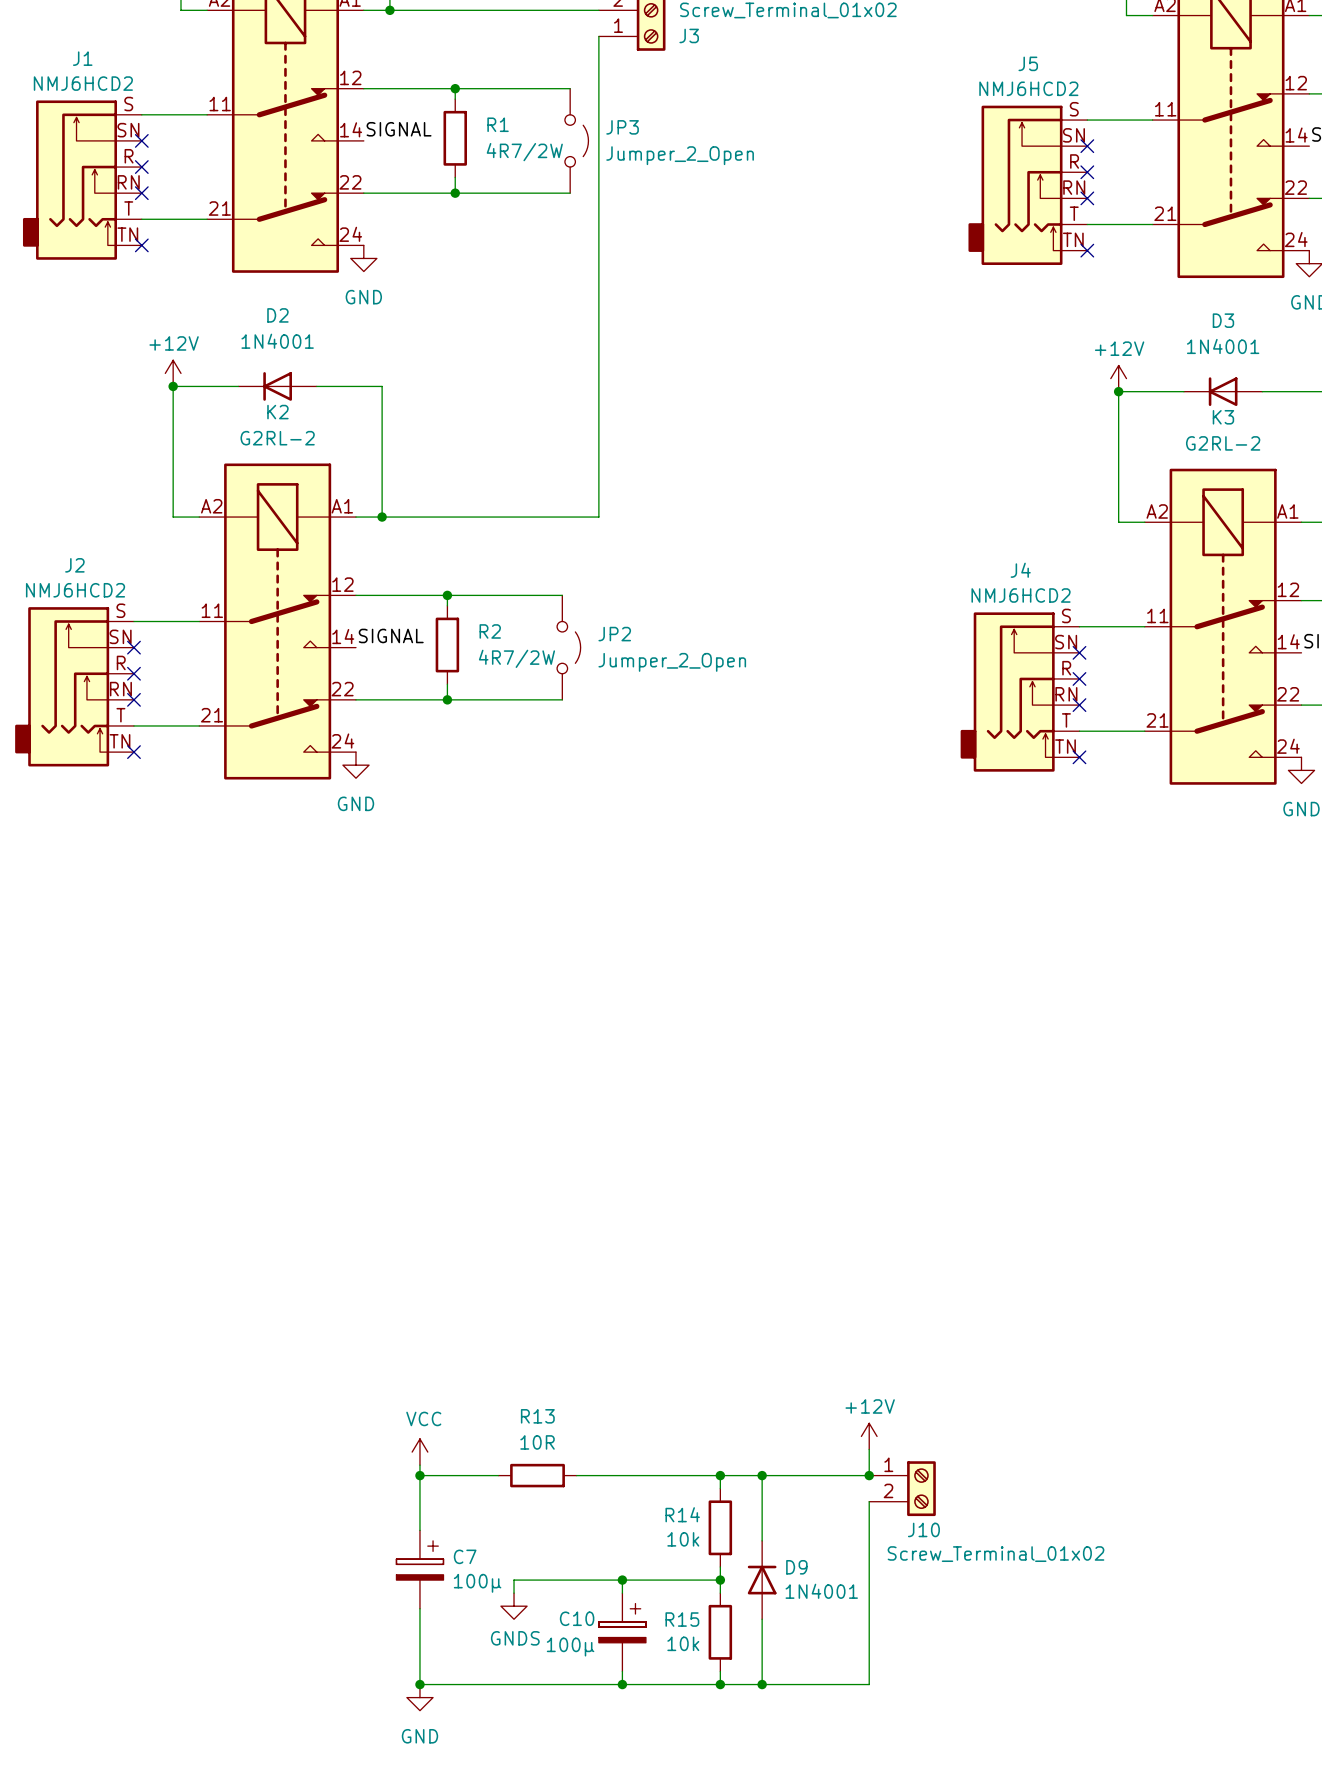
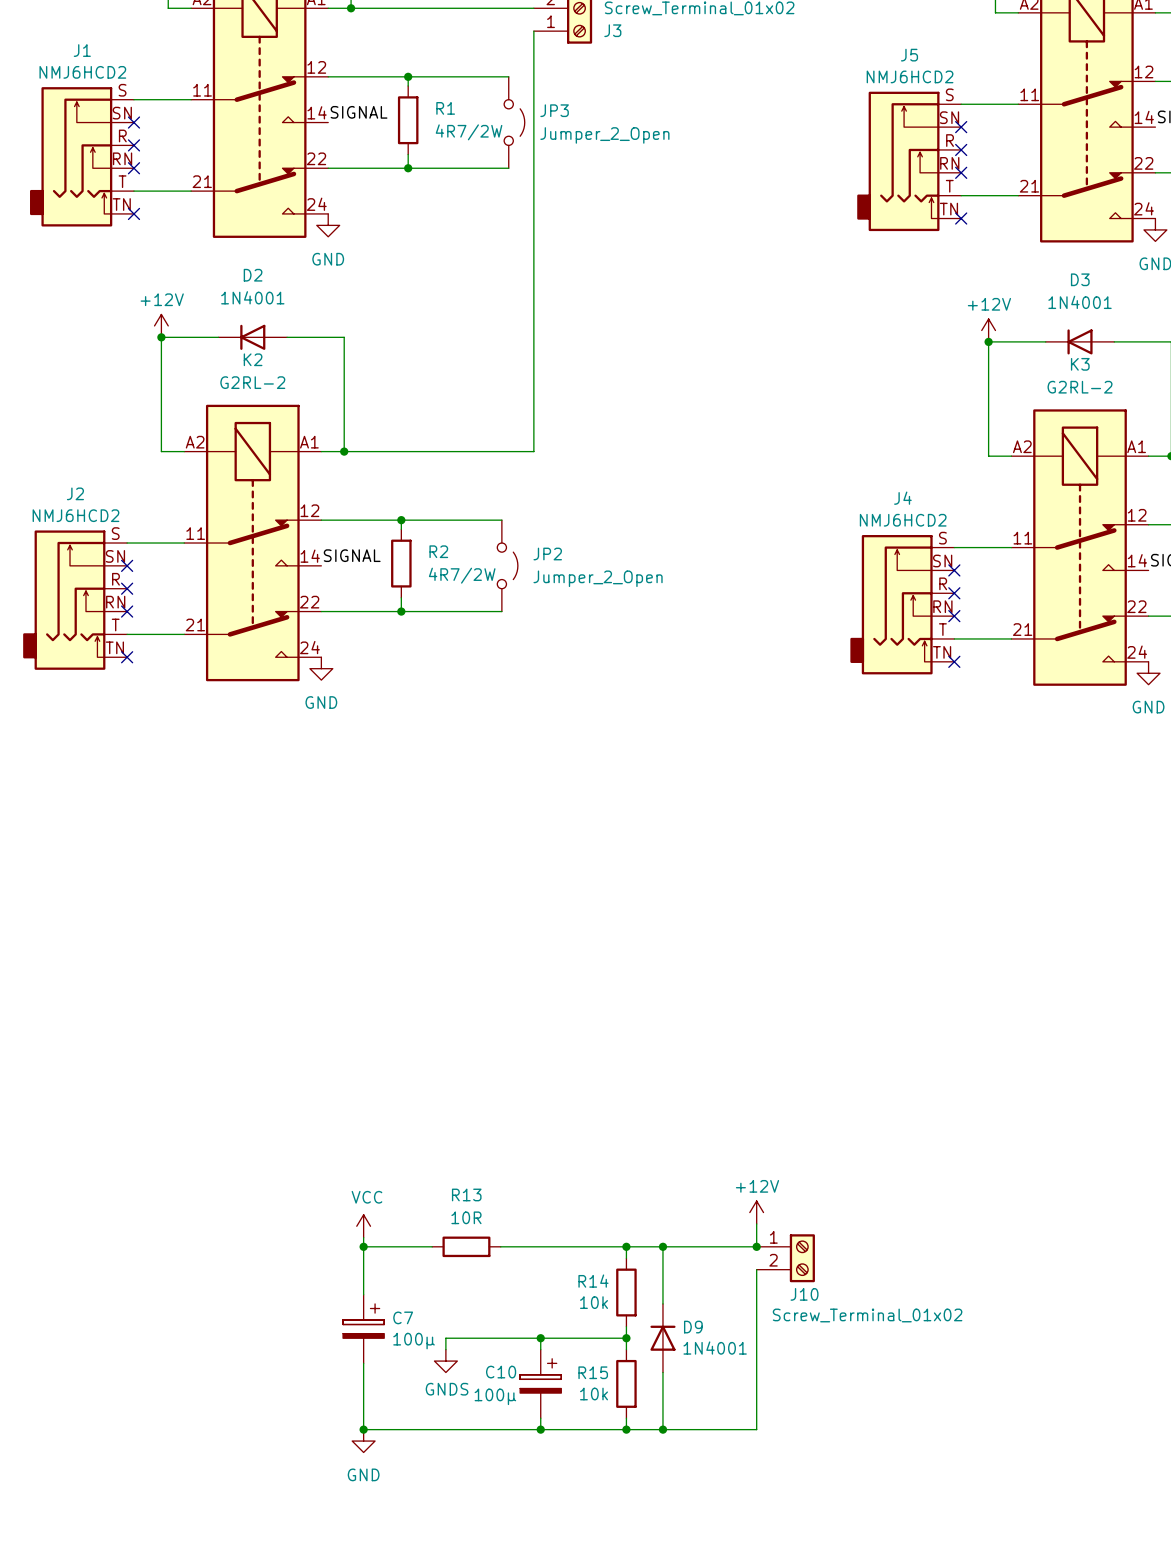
junction: none -> (626, 1246)
junction: none -> (662, 1246)
junction: none -> (756, 1246)
power symbol position: +12V (869, 1436) -> +12V (756, 1212)
wire: (869, 1449) (869, 1475) (576, 1475) -> (756, 1223) (756, 1246) (500, 1246)
power symbol position: VCC (419, 1452) -> VCC (363, 1226)
wire: (419, 1465) (419, 1530) -> (363, 1237) (363, 1294)
wire: (419, 1475) (498, 1475) -> (363, 1246) (432, 1246)
junction position: (419, 1475) -> (363, 1246)
R13 position: (537, 1475) -> (466, 1246)
wire: (720, 1475) (720, 1488) -> (626, 1246) (626, 1258)
junction: (720, 1475) -> none
wire: (762, 1475) (762, 1540) -> (662, 1246) (662, 1303)
junction: (762, 1475) -> none
junction: (869, 1475) -> none
J10 position: (902, 1488) -> (785, 1258)
wire: (869, 1501) (869, 1684) (419, 1684) (419, 1608) -> (756, 1269) (756, 1429) (363, 1429) (363, 1363)
R14 position: (720, 1527) -> (626, 1292)
junction: none -> (540, 1338)
junction: none -> (626, 1338)
wire: (720, 1567) (720, 1593) -> (626, 1326) (626, 1349)
C7 position: (419, 1569) -> (363, 1329)
wire: (622, 1580) (622, 1593) -> (540, 1338) (540, 1349)
junction: (622, 1580) -> none
wire: (720, 1580) (514, 1580) (514, 1593) -> (626, 1338) (445, 1338) (445, 1349)
junction: (720, 1580) -> none
D9 position: (762, 1580) -> (662, 1338)
power symbol position: GNDS (514, 1606) -> GNDS (445, 1361)
wire: (762, 1619) (762, 1684) -> (662, 1372) (662, 1429)
C10 position: (622, 1632) -> (540, 1383)
R15 position: (720, 1632) -> (626, 1383)
junction: none -> (540, 1429)
junction: none -> (626, 1429)
junction: none -> (662, 1429)
wire: (622, 1671) (622, 1684) -> (540, 1418) (540, 1429)
wire: (720, 1671) (720, 1684) -> (626, 1418) (626, 1429)
junction position: (419, 1684) -> (363, 1429)
junction: (622, 1684) -> none
junction: (720, 1684) -> none
junction: (762, 1684) -> none
power symbol position: GND (419, 1697) -> GND (363, 1441)

